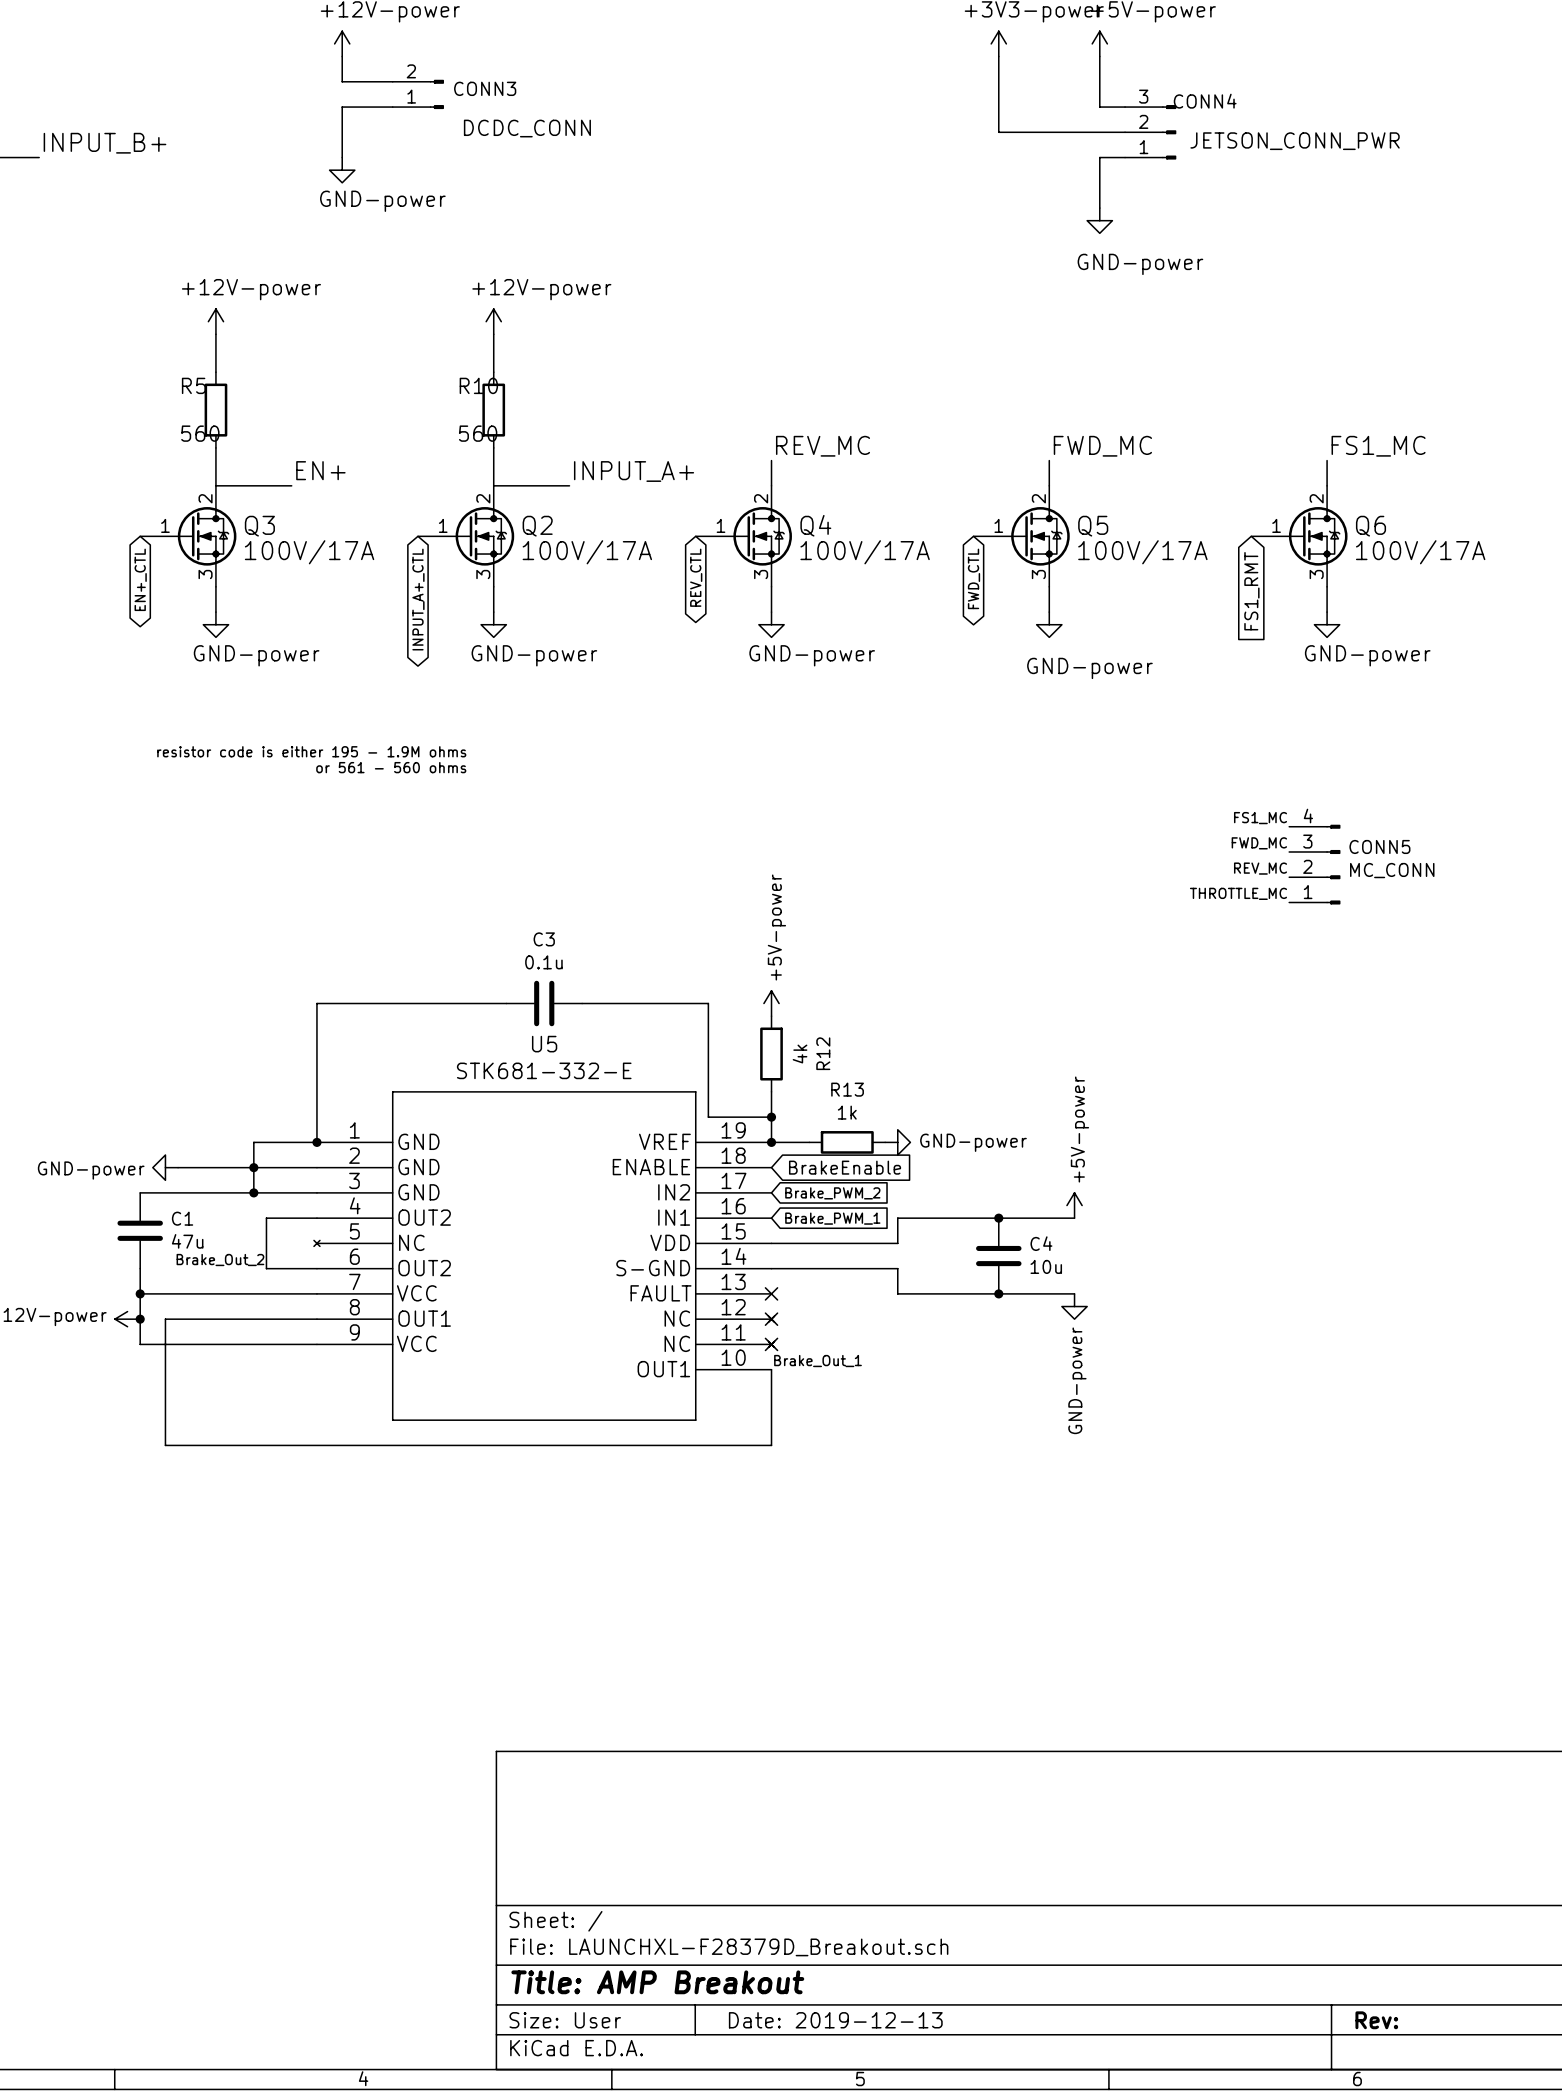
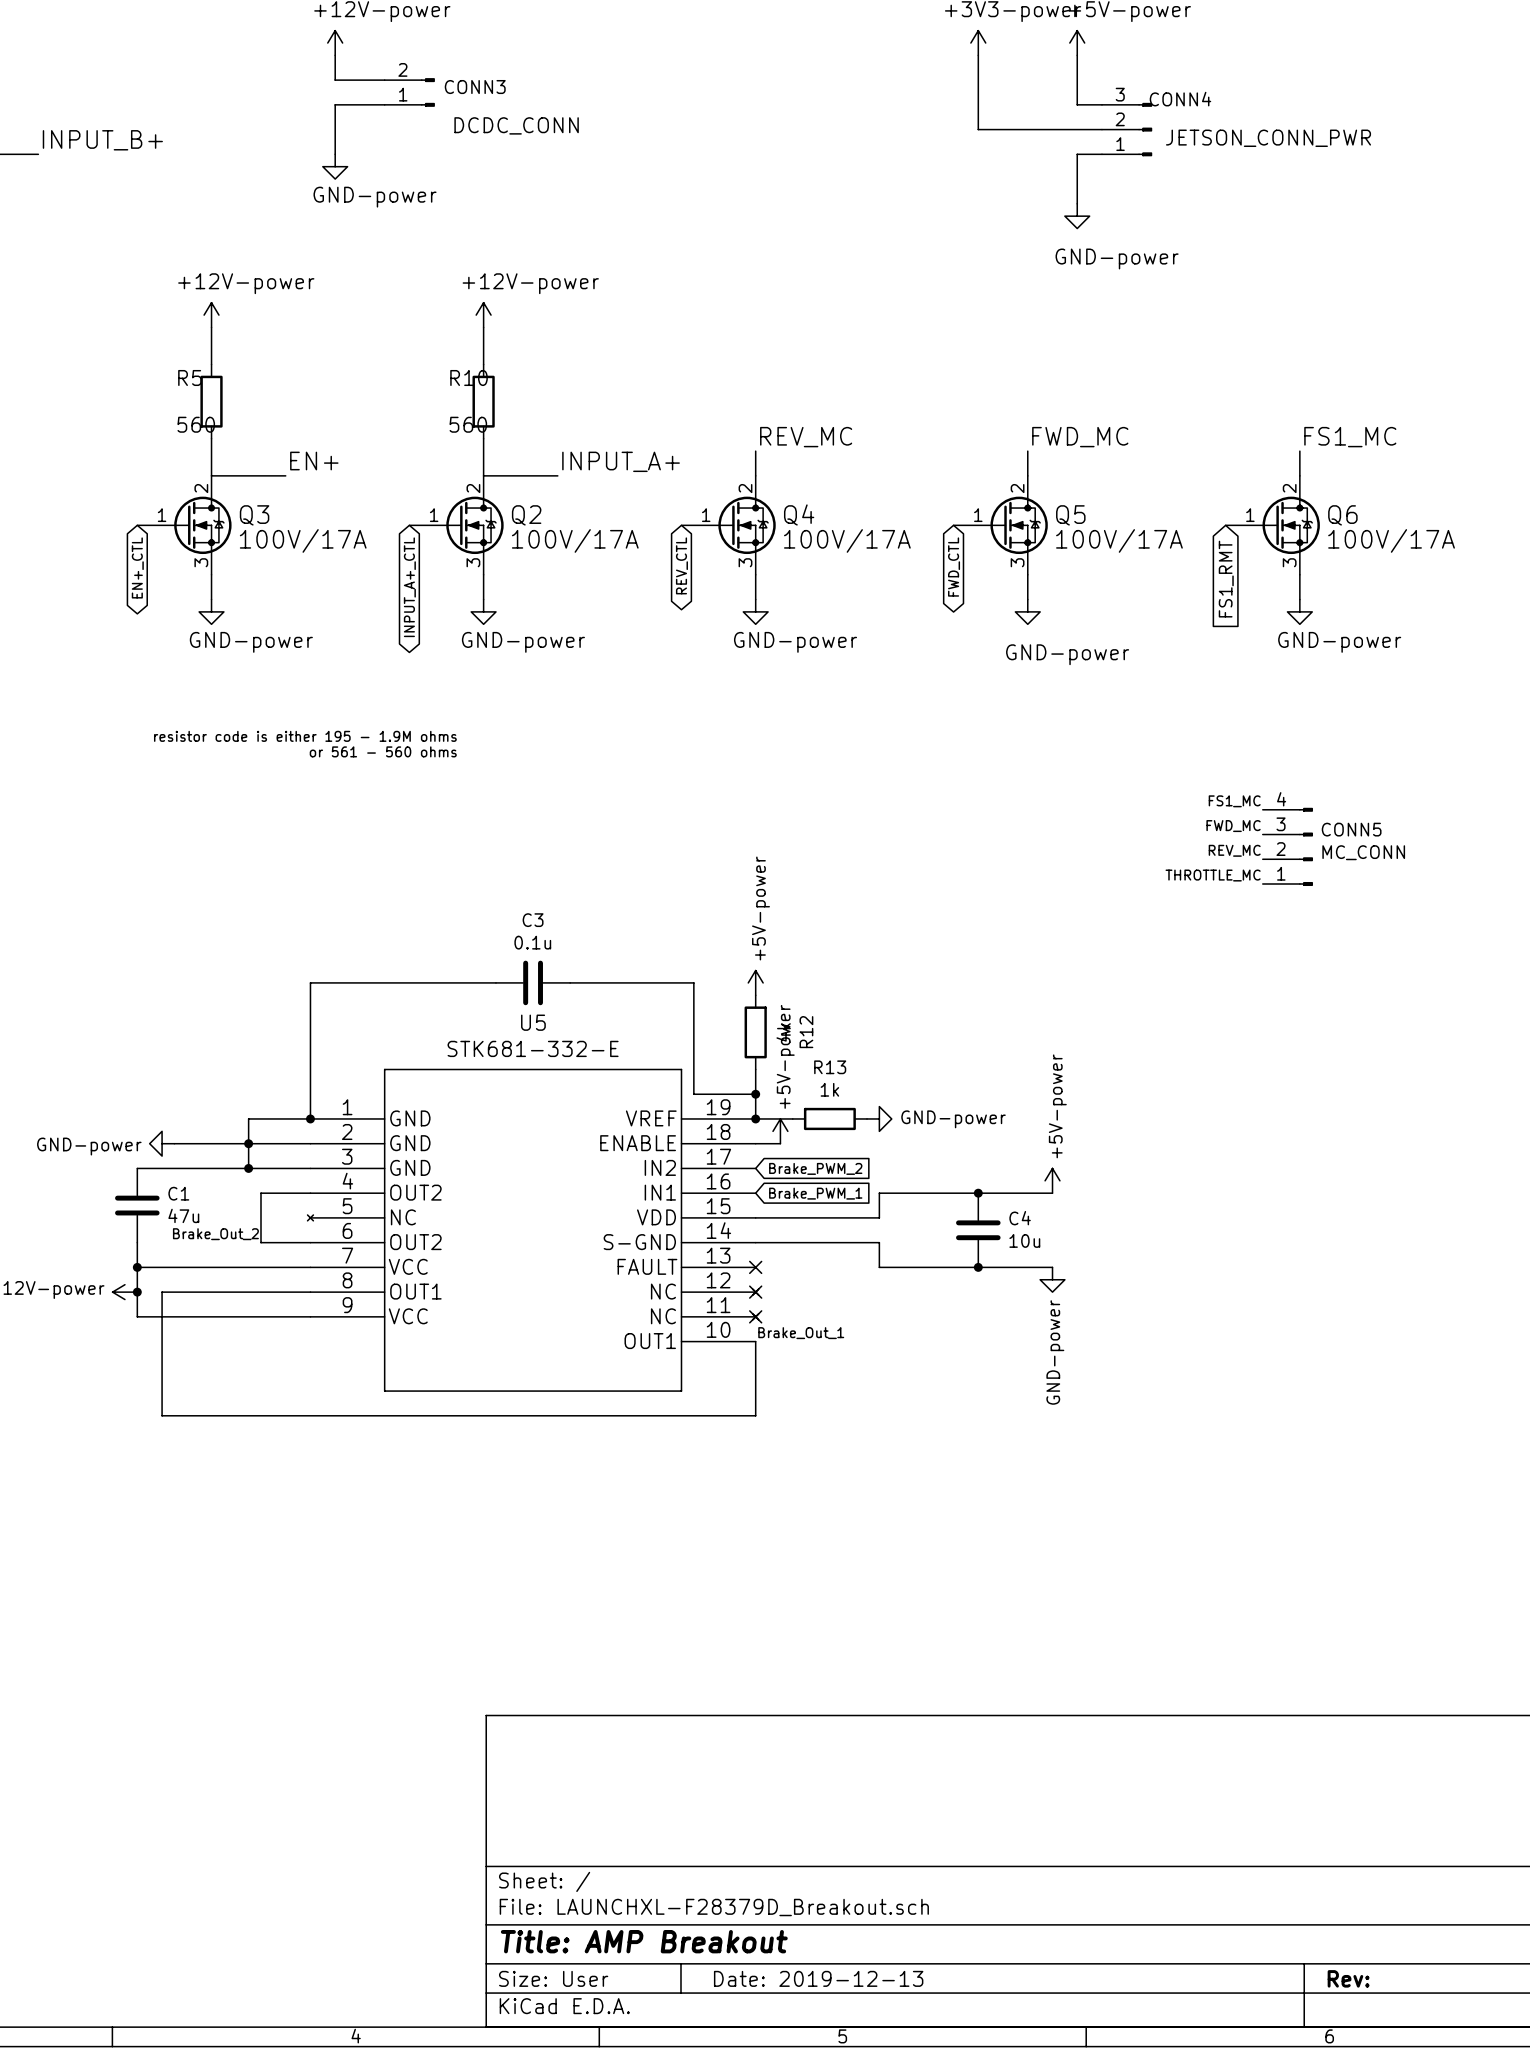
power symbol: none -> +5V-power (780, 1131)
wire: none -> (755, 1143) (780, 1143)
global label: BrakeEnable (845, 1167) -> none

